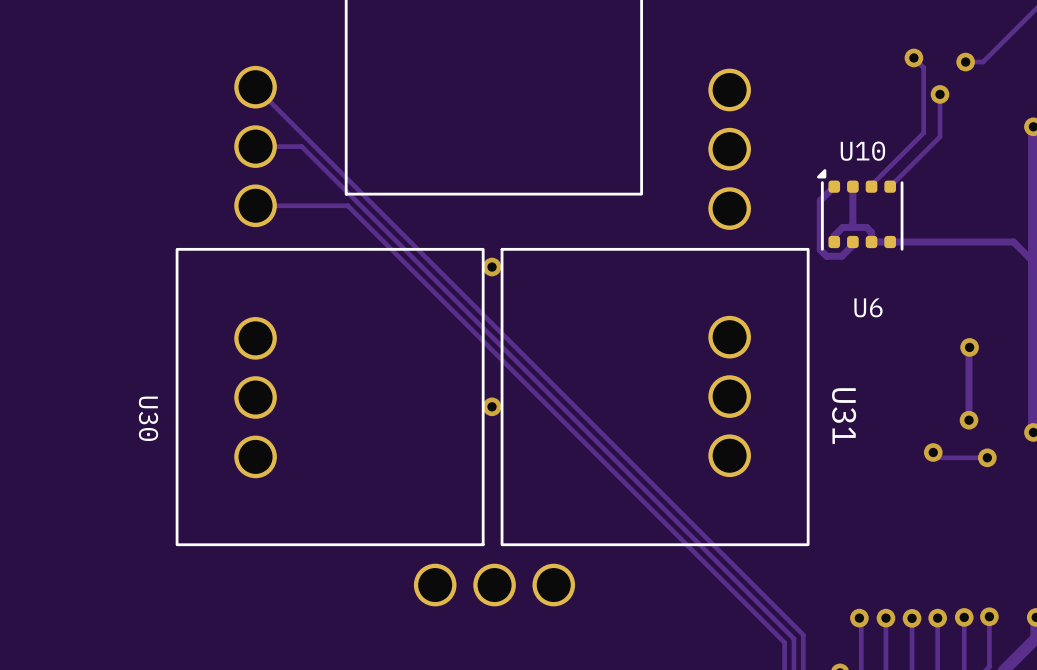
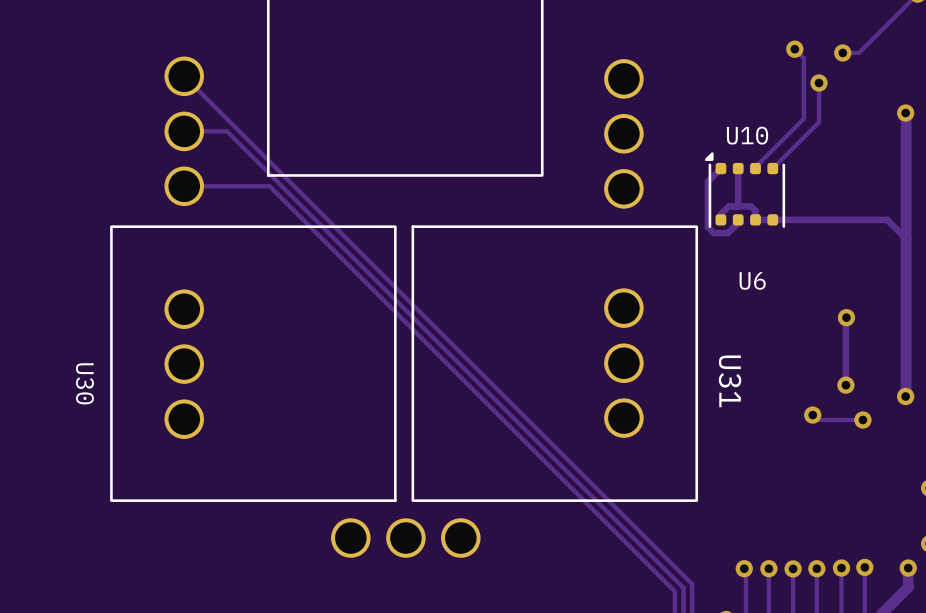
via: (492, 267) -> none
via: (492, 406) -> none

